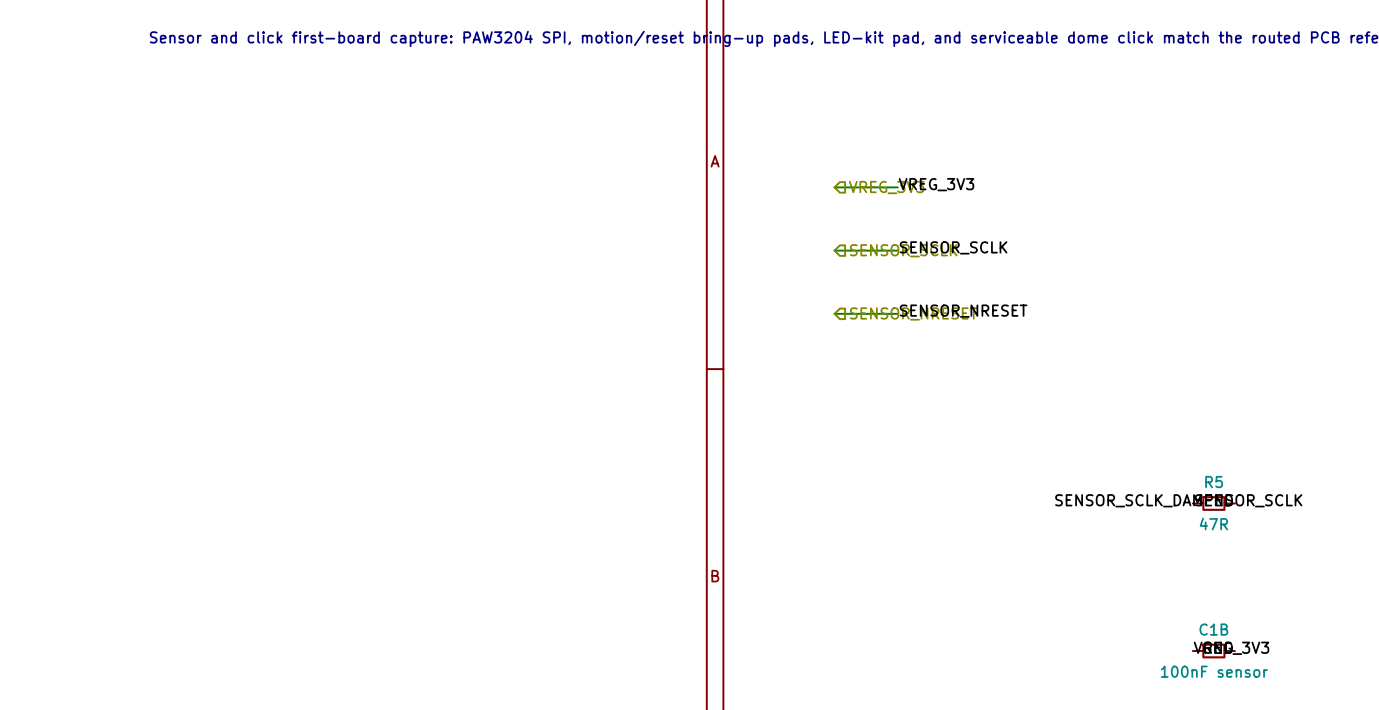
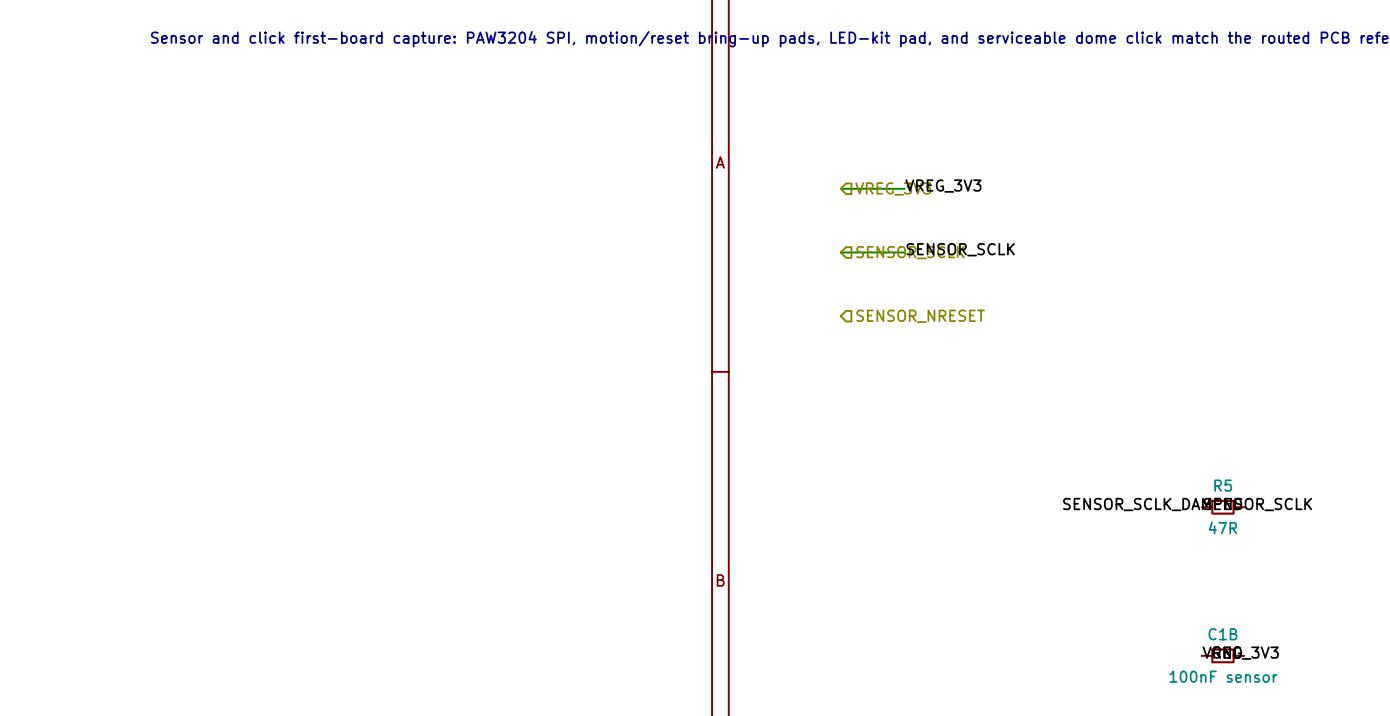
label: SENSOR_NRESET (963, 311) -> none
wire: (834, 313) (897, 313) -> none

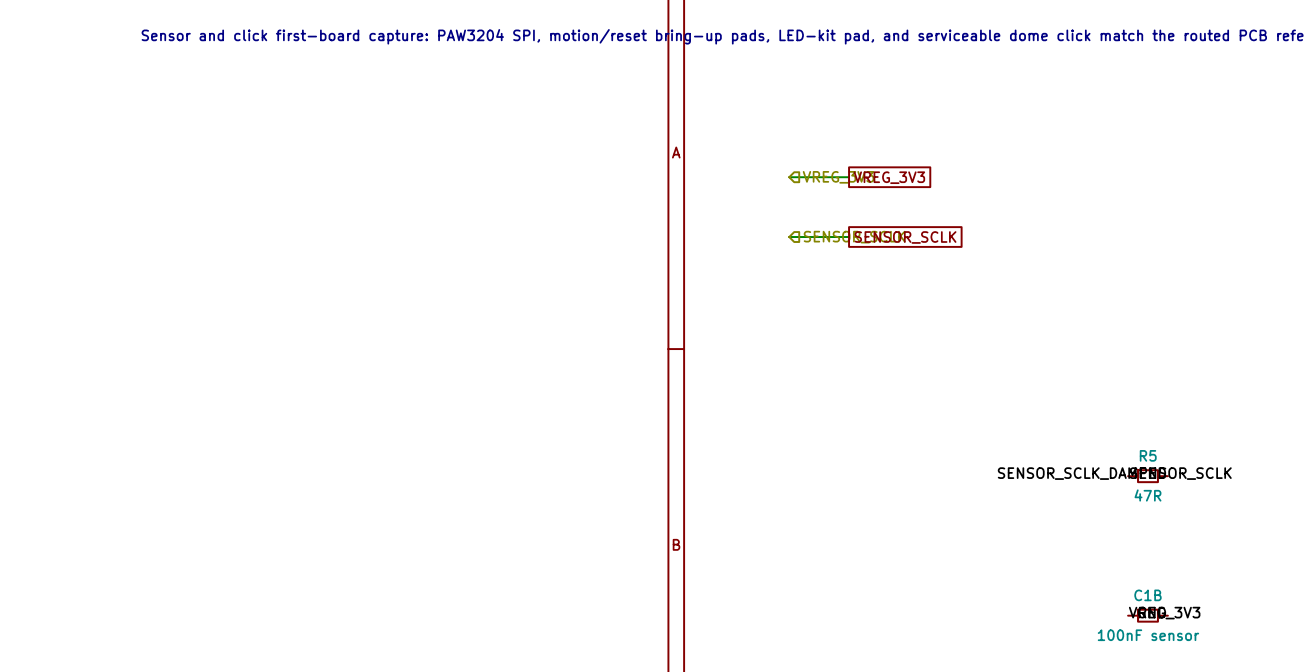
label: VREG_3V3 (943, 186) -> none
global label: none -> VREG_3V3 (889, 177)
label: SENSOR_SCLK (960, 249) -> none
global label: none -> SENSOR_SCLK (905, 237)
hierarchical label: SENSOR_NRESET (920, 316) -> none

